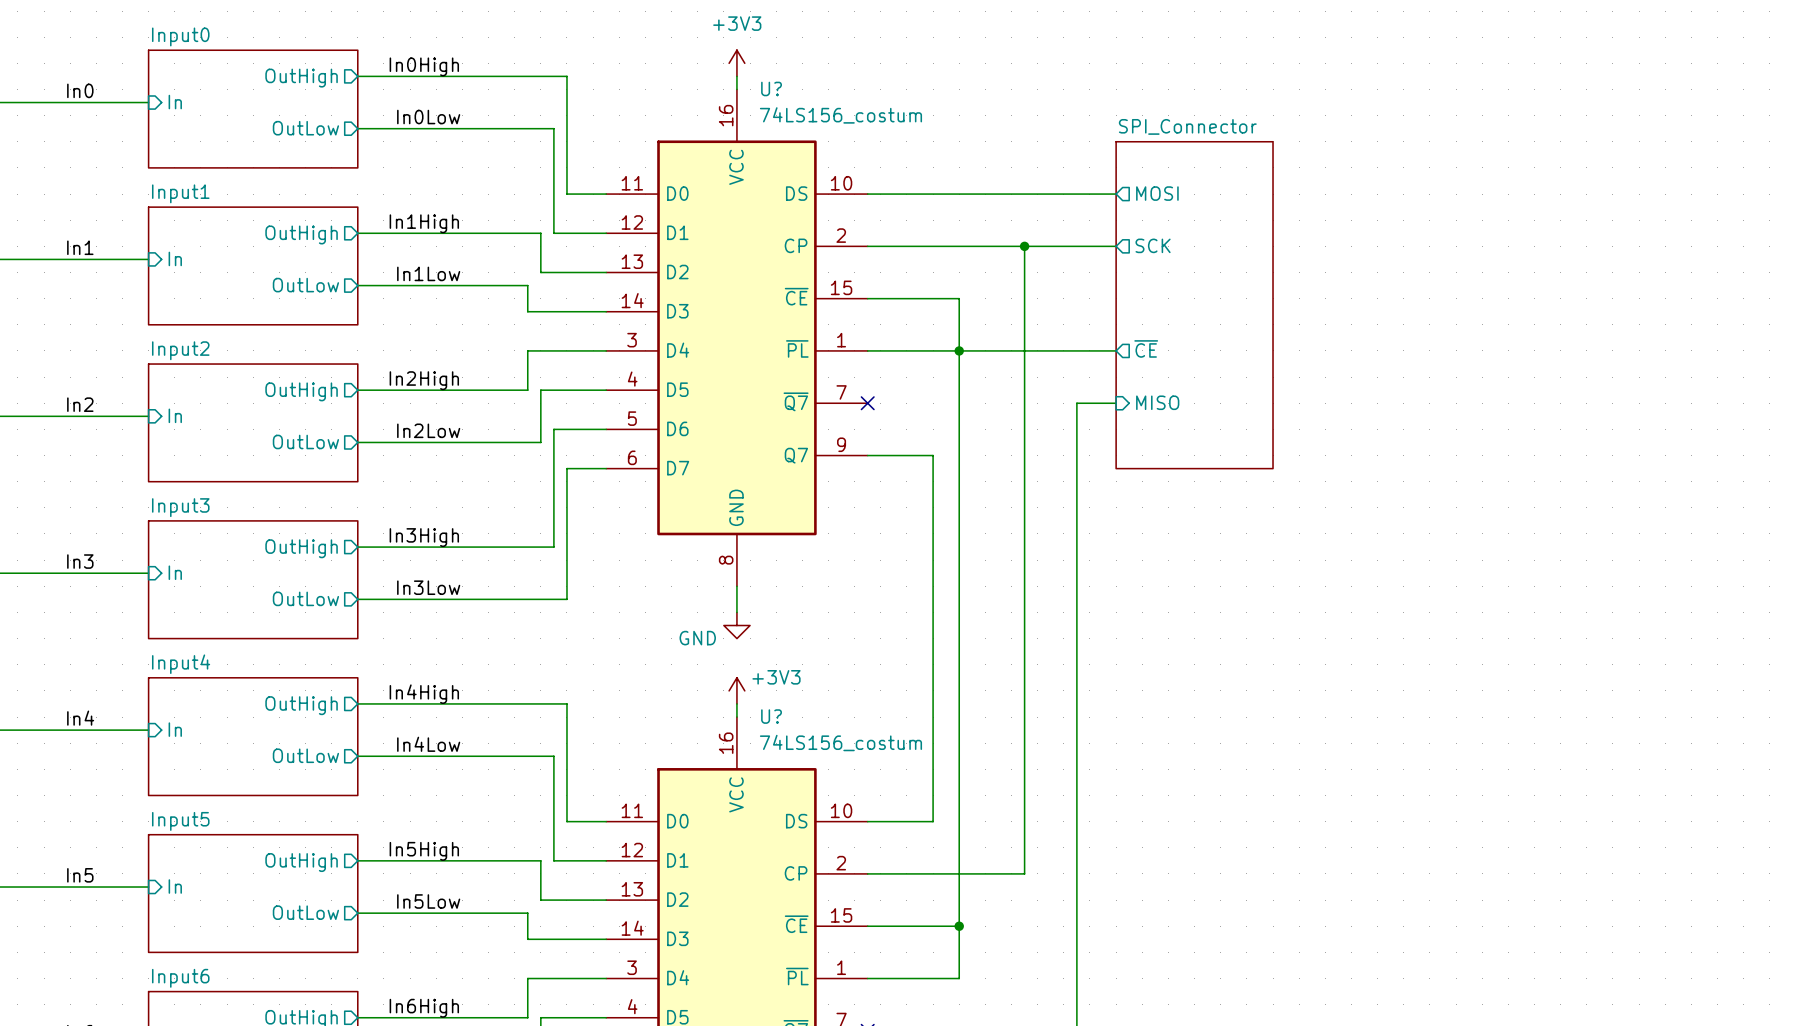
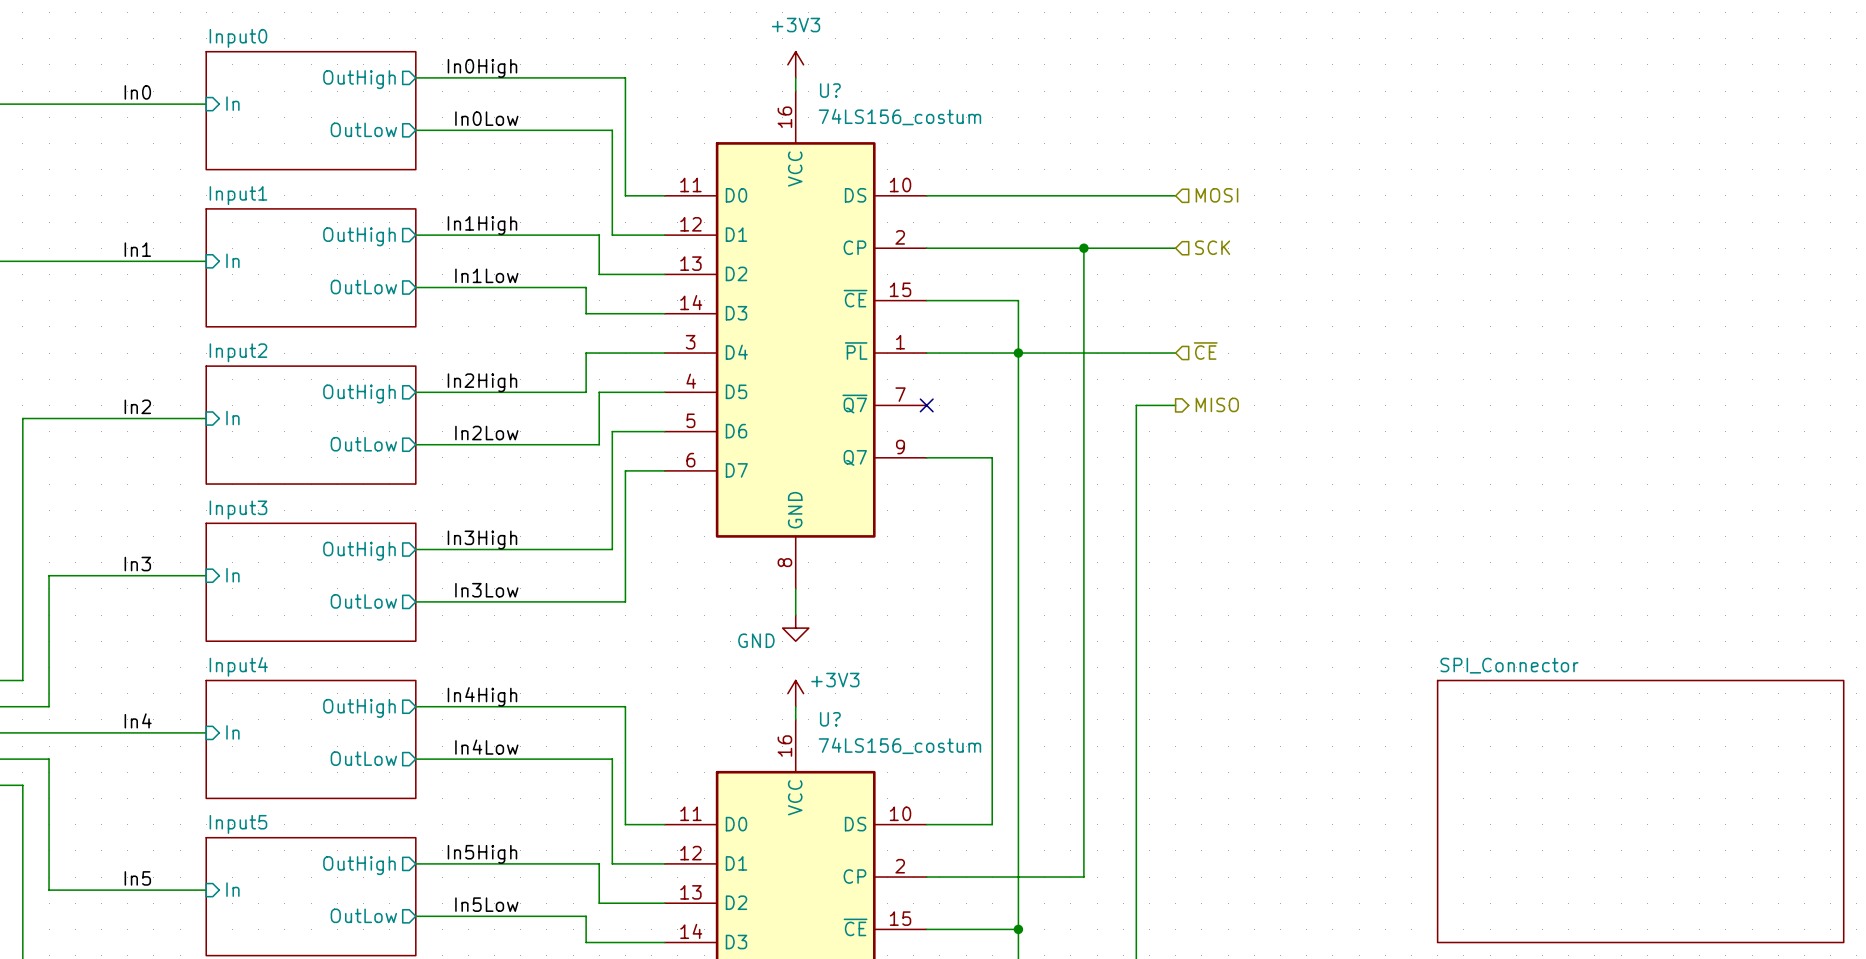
sheet pin: MOSI (1157, 193) -> none
hierarchical label: none -> MOSI (1216, 195)
sheet pin: SCK (1153, 245) -> none
hierarchical label: none -> SCK (1212, 247)
sheet SPI_Connector: (1194, 305) -> none
sheet pin: ~{CE} (1146, 348) -> none
hierarchical label: none -> ~{CE} (1205, 351)
sheet pin: MISO (1157, 402) -> none
hierarchical label: none -> MISO (1217, 404)
sheet SPI_Connector: none -> (1640, 811)

